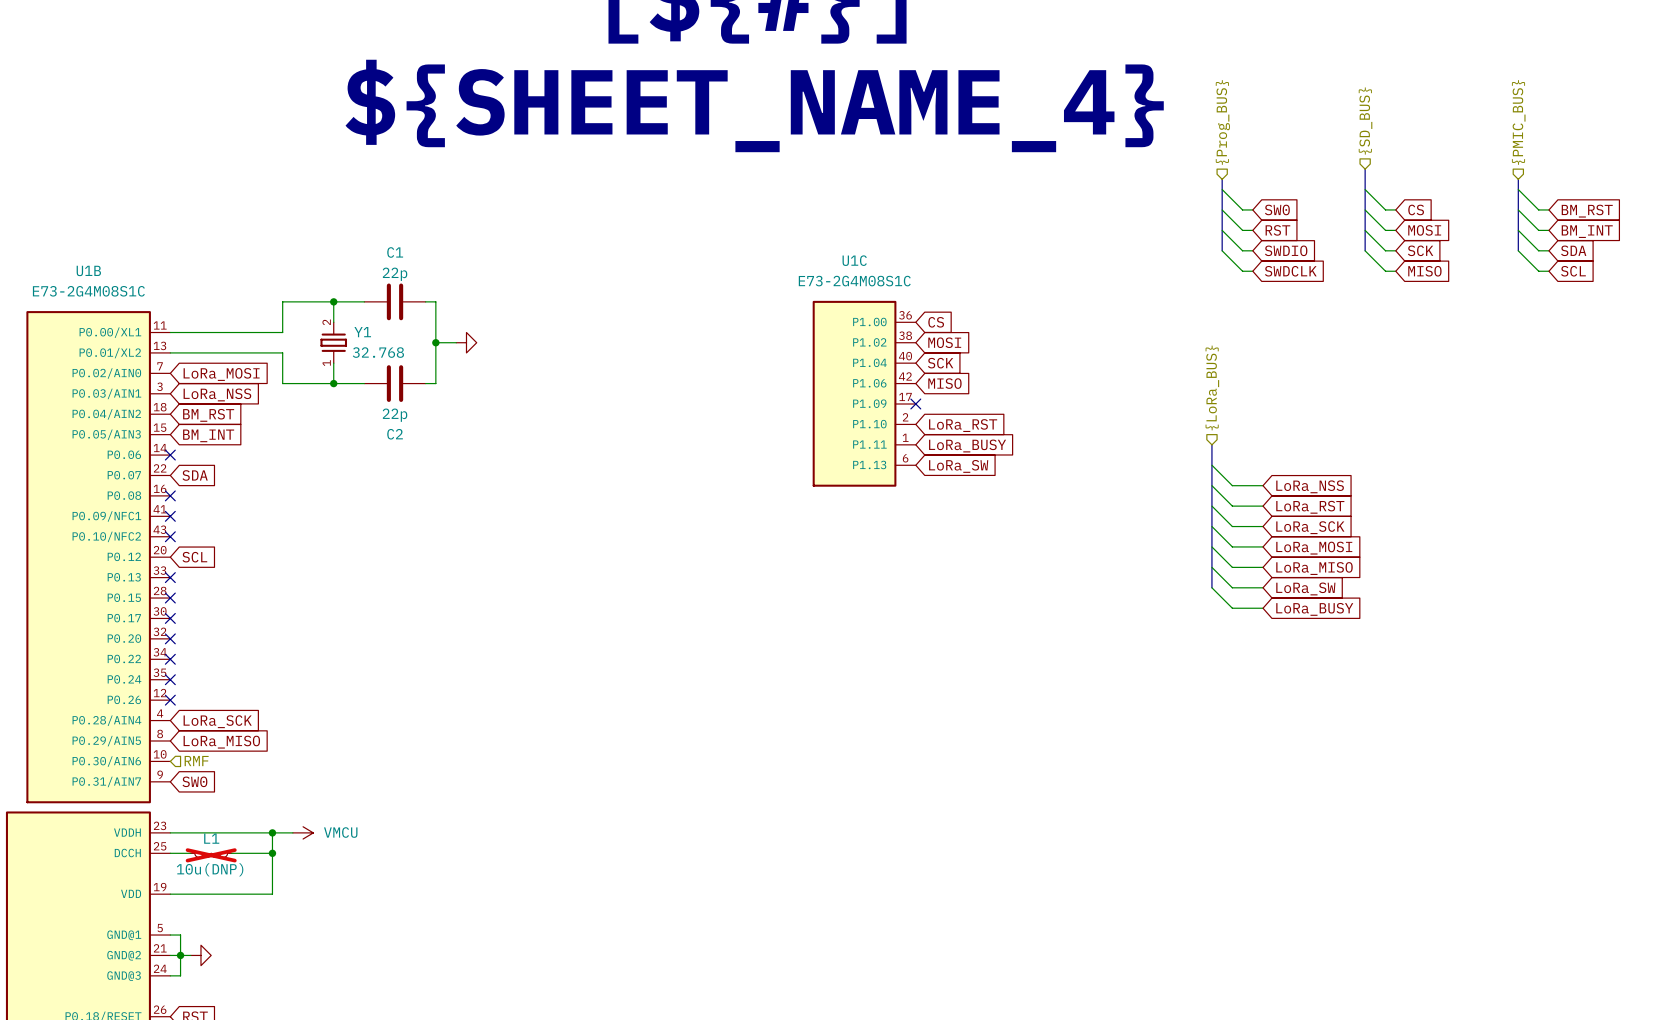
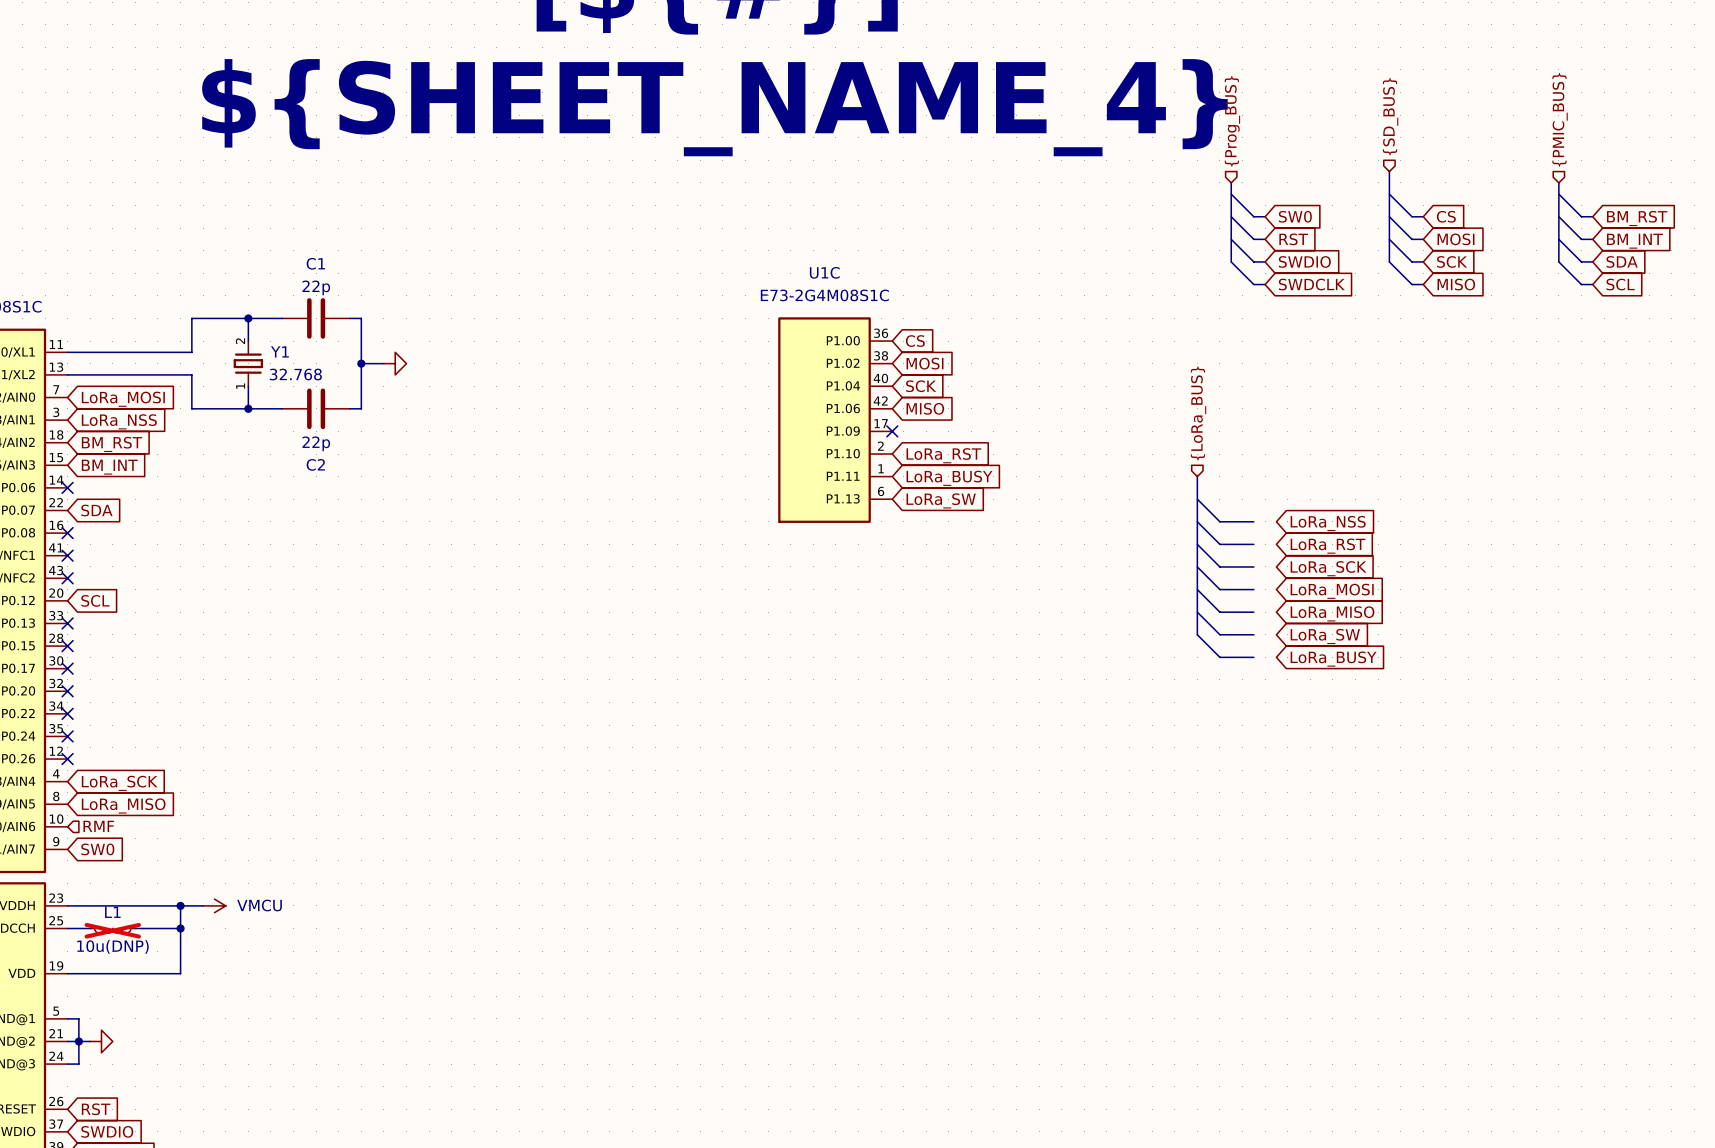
hierarchical label position: {LoRa_BUS} (1212, 387) -> {LoRa_BUS} (1198, 413)
bus: (1211, 444) (1211, 587) -> (1197, 476) (1197, 634)
wire: (1211, 465) (1232, 485) -> (1197, 499) (1219, 521) (1242, 521)
wire: (1211, 485) (1232, 506) -> (1197, 521) (1219, 544) (1242, 544)
wire: (1242, 485) (1263, 485) -> none
wire: (1211, 506) (1232, 526) -> (1197, 544) (1219, 566) (1242, 566)
wire: (1242, 506) (1263, 506) -> none
wire: (1211, 526) (1232, 546) -> (1197, 566) (1219, 589) (1242, 589)
wire: (1242, 526) (1263, 526) -> none
wire: (1211, 546) (1232, 567) -> (1197, 589) (1219, 612) (1242, 612)
wire: (1242, 546) (1263, 546) -> none
wire: (1211, 567) (1232, 587) -> (1197, 612) (1219, 634) (1242, 634)
wire: (1242, 567) (1263, 567) -> none
wire: (1211, 587) (1232, 608) -> (1197, 634) (1219, 657) (1242, 657)
wire: (1242, 587) (1263, 587) -> none
wire: (1242, 608) (1263, 608) -> none

